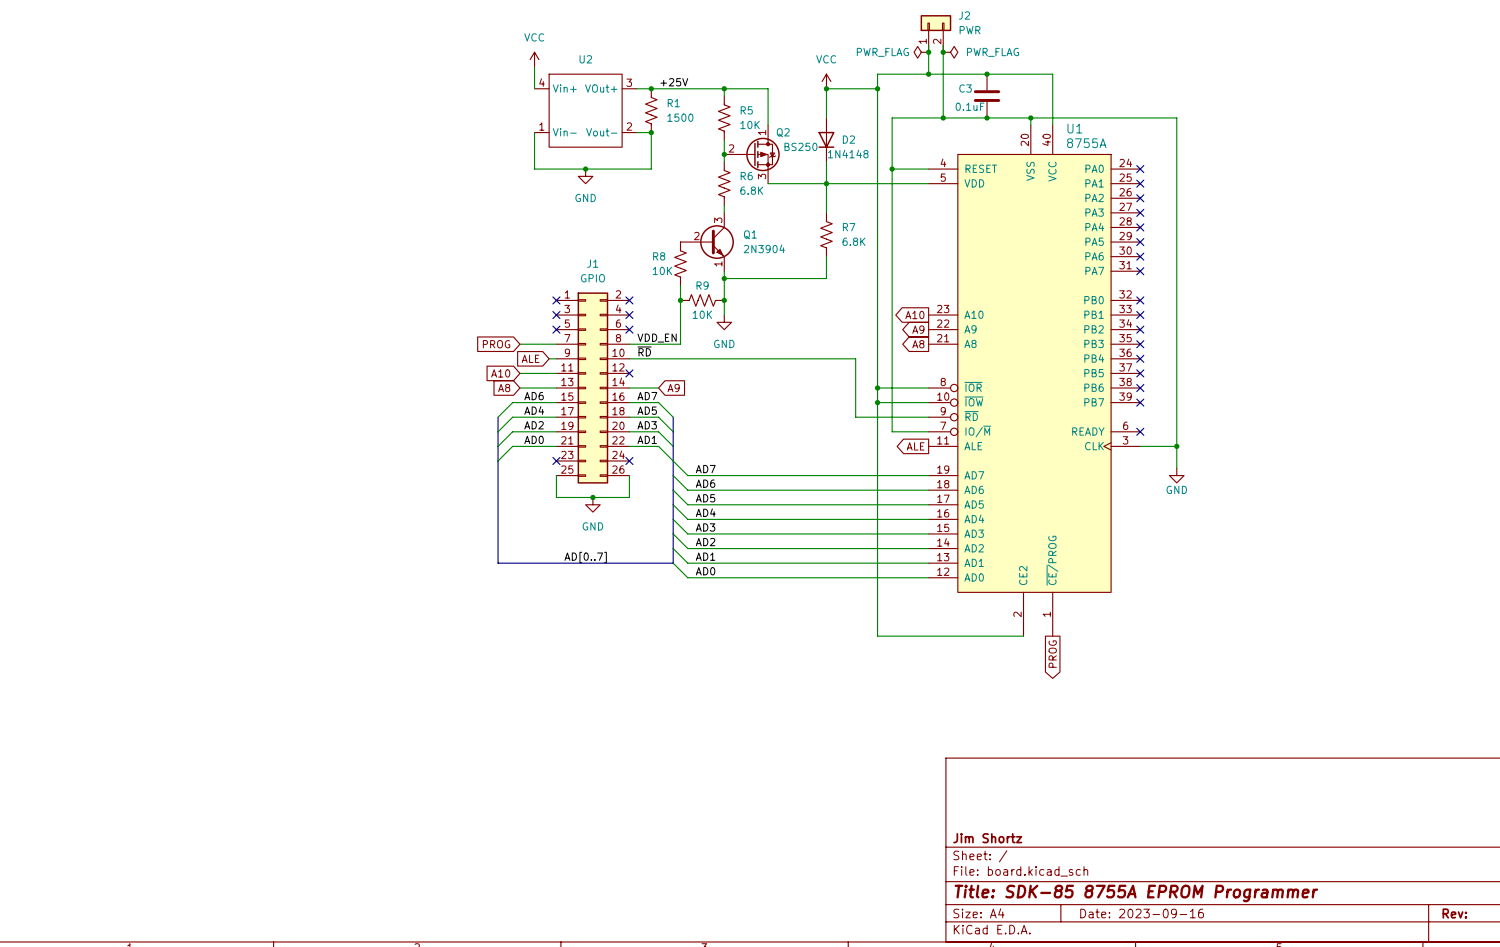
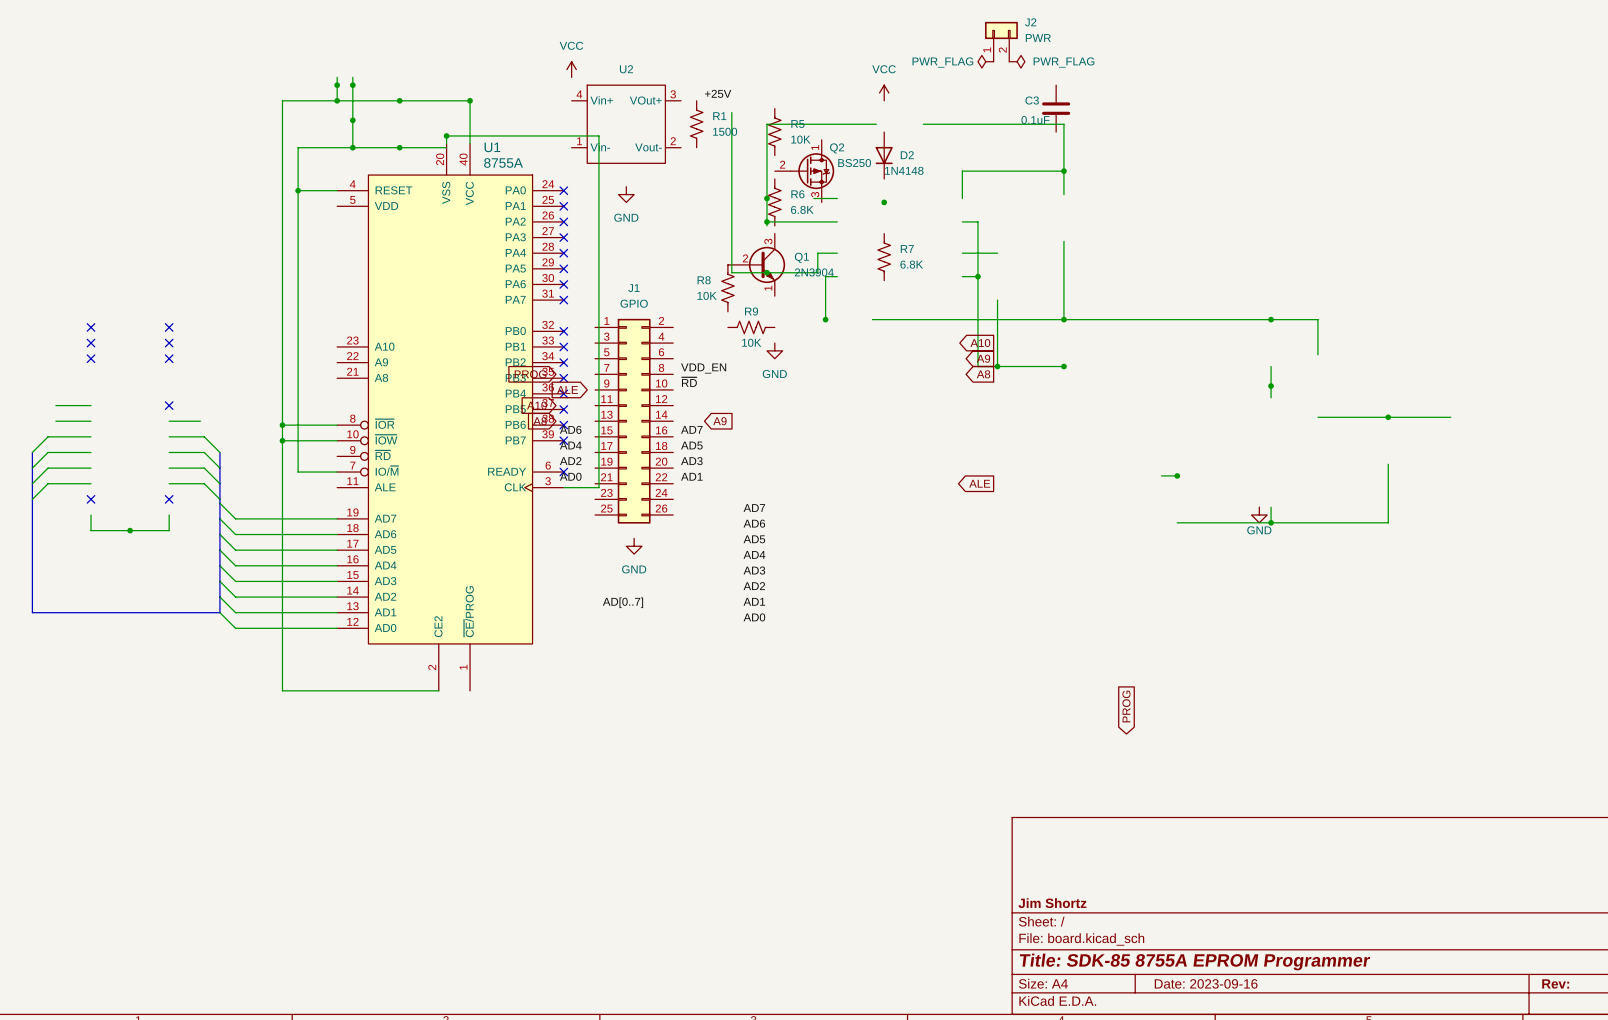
wire: (928, 44) (928, 74) -> none
wire: (943, 44) (943, 117) -> none
junction: (928, 52) -> none
junction: (943, 52) -> none
wire: none -> (337, 77) (337, 100)
wire: none -> (352, 77) (352, 147)
wire: (534, 66) (534, 88) -> none
junction: none -> (337, 85)
junction: none -> (352, 85)
junction: (928, 74) -> none
junction: (987, 74) -> none
junction: none -> (337, 100)
junction: none -> (399, 100)
junction: none -> (470, 100)
wire: (636, 88) (768, 88) (768, 125) -> none
junction: (651, 88) -> none
wire: (724, 88) (724, 96) -> none
junction: (724, 88) -> none
junction: (826, 88) -> none
wire: (877, 88) (826, 88) (826, 117) -> none
junction: (877, 88) -> none
wire: none -> (731, 112) (731, 272) (817, 272) (817, 253) (837, 253)
junction: none -> (352, 120)
wire: none -> (876, 124) (766, 124) (766, 225)
wire: none -> (923, 124) (1063, 124) (1063, 194)
junction: (943, 117) -> none
junction: (987, 117) -> none
wire: (1030, 117) (1030, 125) -> none
junction: (1030, 117) -> none
junction: none -> (446, 135)
wire: (1052, 125) (1052, 74) (877, 74) (877, 636) (1023, 636) -> none
wire: none -> (446, 143) (446, 135) (598, 135) (598, 487) (563, 487)
wire: none -> (470, 143) (470, 100) (282, 100) (282, 690) (438, 690)
junction: none -> (352, 147)
junction: none -> (399, 147)
wire: none -> (446, 147) (298, 147) (298, 472) (337, 472)
wire: (534, 132) (534, 169) (651, 169) (651, 132) (636, 132) -> none
junction: (651, 132) -> none
wire: (724, 139) (724, 161) -> none
junction: (724, 154) -> none
wire: none -> (1063, 171) (962, 171) (962, 198)
junction: none -> (1063, 171)
wire: (826, 161) (826, 212) -> none
junction: (585, 169) -> none
wire: (892, 169) (928, 169) -> none
junction: (892, 169) -> none
no-connect mark: (1140, 169) -> none
wire: none -> (298, 190) (337, 190)
junction: none -> (298, 190)
no-connect mark: none -> (563, 190)
junction: none -> (766, 198)
wire: none -> (813, 198) (837, 198)
wire: (768, 183) (928, 183) -> none
no-connect mark: (1140, 183) -> none
no-connect mark: none -> (563, 206)
no-connect mark: (1140, 198) -> none
no-connect mark: none -> (563, 221)
wire: none -> (766, 221) (837, 221)
junction: none -> (766, 221)
wire: none -> (962, 221) (977, 221) (977, 366) (1063, 366)
wire: (724, 205) (724, 212) -> none
no-connect mark: (1140, 212) -> none
no-connect mark: none -> (563, 237)
no-connect mark: (1140, 227) -> none
no-connect mark: none -> (563, 253)
wire: none -> (962, 253) (997, 253)
no-connect mark: (1140, 242) -> none
no-connect mark: none -> (563, 268)
junction: none -> (766, 272)
wire: none -> (837, 276) (825, 276) (825, 319)
wire: none -> (962, 276) (977, 276)
junction: none -> (977, 276)
wire: (826, 256) (826, 278) (724, 278) -> none
no-connect mark: (1140, 256) -> none
no-connect mark: none -> (563, 284)
wire: (724, 271) (724, 315) -> none
no-connect mark: (1140, 271) -> none
no-connect mark: none -> (563, 300)
wire: none -> (997, 300) (997, 366)
junction: (724, 278) -> none
wire: (680, 285) (680, 344) (629, 344) -> none
junction: none -> (825, 319)
wire: none -> (872, 319) (1317, 319) (1317, 354)
junction: none -> (1063, 319)
junction: none -> (1271, 319)
no-connect mark: none -> (91, 327)
no-connect mark: none -> (169, 327)
no-connect mark: (556, 300) -> none
no-connect mark: (629, 300) -> none
junction: (680, 300) -> none
junction: (724, 300) -> none
no-connect mark: (1140, 300) -> none
no-connect mark: none -> (563, 331)
no-connect mark: none -> (91, 343)
no-connect mark: none -> (169, 343)
no-connect mark: (556, 315) -> none
no-connect mark: (629, 315) -> none
no-connect mark: (1140, 315) -> none
no-connect mark: none -> (563, 346)
no-connect mark: none -> (91, 358)
no-connect mark: none -> (169, 358)
no-connect mark: (556, 329) -> none
no-connect mark: (629, 329) -> none
no-connect mark: (1140, 329) -> none
no-connect mark: none -> (563, 362)
junction: none -> (997, 366)
junction: none -> (1063, 366)
wire: none -> (1271, 366) (1271, 397)
wire: (519, 344) (556, 344) -> none
no-connect mark: (1140, 344) -> none
no-connect mark: none -> (563, 378)
junction: none -> (1271, 386)
wire: (549, 358) (556, 358) -> none
wire: (629, 358) (855, 358) (855, 417) (928, 417) -> none
no-connect mark: (1140, 358) -> none
no-connect mark: none -> (563, 393)
wire: none -> (55, 405) (91, 405)
no-connect mark: none -> (169, 405)
wire: (519, 373) (556, 373) -> none
no-connect mark: (629, 373) -> none
no-connect mark: (1140, 373) -> none
no-connect mark: none -> (563, 409)
U1 position: (1034, 380) -> (450, 417)
wire: none -> (1317, 417) (1450, 417)
junction: none -> (1388, 417)
wire: none -> (55, 421) (91, 421)
wire: none -> (169, 421) (200, 421)
wire: (519, 388) (556, 388) -> none
wire: (629, 388) (658, 388) -> none
wire: (877, 388) (928, 388) -> none
junction: (877, 388) -> none
no-connect mark: (1140, 388) -> none
wire: none -> (282, 425) (337, 425)
junction: none -> (282, 425)
no-connect mark: none -> (563, 425)
wire: none -> (91, 436) (48, 436) (32, 452)
wire: none -> (169, 436) (204, 436) (219, 452)
wire: (556, 402) (512, 402) (498, 417) -> none
wire: (629, 402) (658, 402) (673, 417) -> none
wire: (877, 402) (928, 402) -> none
junction: (877, 402) -> none
no-connect mark: (1140, 402) -> none
wire: none -> (282, 440) (337, 440)
junction: none -> (282, 440)
no-connect mark: none -> (563, 440)
bus: none -> (32, 452) (32, 612) (219, 612) (219, 452)
wire: none -> (91, 452) (48, 452) (32, 468)
wire: none -> (169, 452) (204, 452) (219, 468)
bus: (498, 417) (498, 563) (673, 563) (673, 417) -> none
wire: (556, 417) (512, 417) (498, 431) -> none
wire: (629, 417) (658, 417) (673, 431) -> none
wire: none -> (1388, 464) (1388, 522) (1177, 522)
wire: none -> (91, 468) (48, 468) (32, 483)
wire: none -> (169, 468) (204, 468) (219, 483)
wire: (556, 431) (512, 431) (498, 446) -> none
wire: (629, 431) (658, 431) (673, 446) -> none
wire: (928, 431) (892, 431) (892, 117) (1176, 117) (1176, 468) -> none
no-connect mark: (1140, 431) -> none
no-connect mark: none -> (563, 472)
junction: none -> (1177, 475)
wire: none -> (91, 483) (48, 483) (32, 499)
wire: none -> (169, 483) (204, 483) (219, 499)
wire: (556, 446) (512, 446) (498, 460) -> none
wire: (629, 446) (658, 446) (687, 475) (928, 475) -> none
wire: (1140, 446) (1176, 446) -> none
junction: (1176, 446) -> none
no-connect mark: none -> (91, 499)
no-connect mark: none -> (169, 499)
no-connect mark: (556, 460) -> none
no-connect mark: (629, 460) -> none
wire: none -> (219, 503) (235, 518)
wire: none -> (1271, 507) (1271, 522)
wire: none -> (91, 515) (91, 530) (169, 530) (169, 515)
wire: (556, 475) (556, 497) (629, 497) (629, 475) -> none
wire: (673, 475) (687, 490) (928, 490) -> none
wire: none -> (219, 518) (235, 534) (337, 534)
wire: none -> (235, 518) (337, 518)
junction: none -> (1271, 522)
junction: none -> (130, 530)
wire: (673, 490) (687, 504) (928, 504) -> none
wire: none -> (219, 534) (235, 550) (337, 550)
junction: (592, 497) -> none
wire: (673, 504) (687, 519) (928, 519) -> none
wire: none -> (219, 550) (235, 565)
wire: (673, 519) (687, 533) (928, 533) -> none
wire: none -> (219, 565) (235, 581) (337, 581)
wire: none -> (235, 565) (337, 565)
wire: (673, 533) (687, 548) (928, 548) -> none
wire: none -> (219, 581) (235, 597) (337, 597)
wire: (673, 548) (687, 563) (928, 563) -> none
wire: none -> (219, 597) (235, 612) (337, 612)
wire: (673, 563) (687, 577) (928, 577) -> none
wire: none -> (219, 612) (235, 628) (337, 628)

